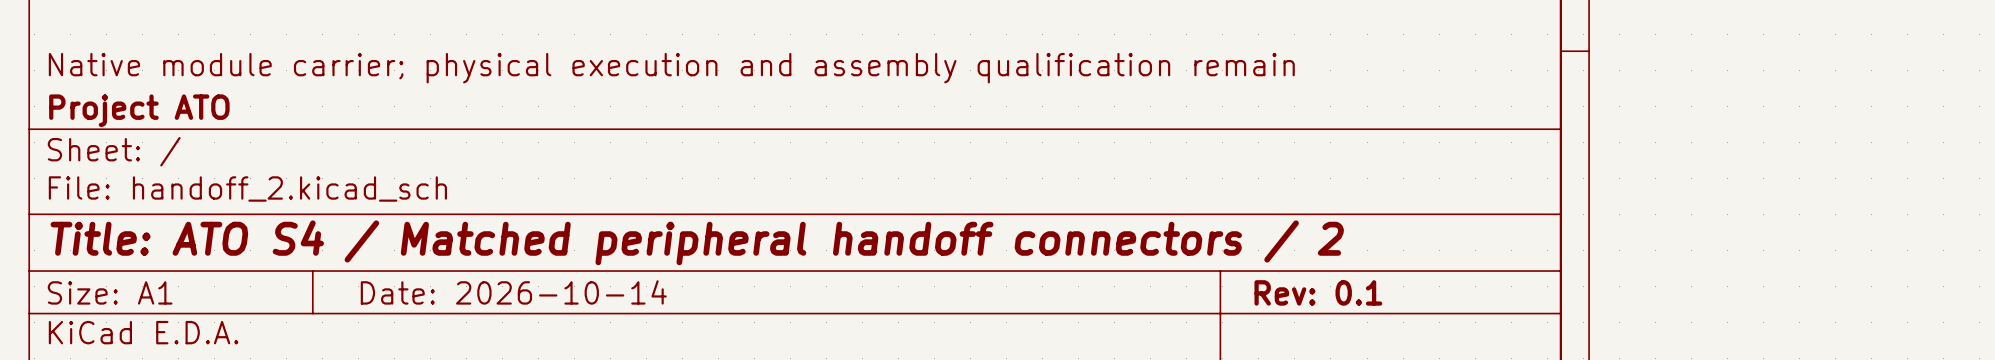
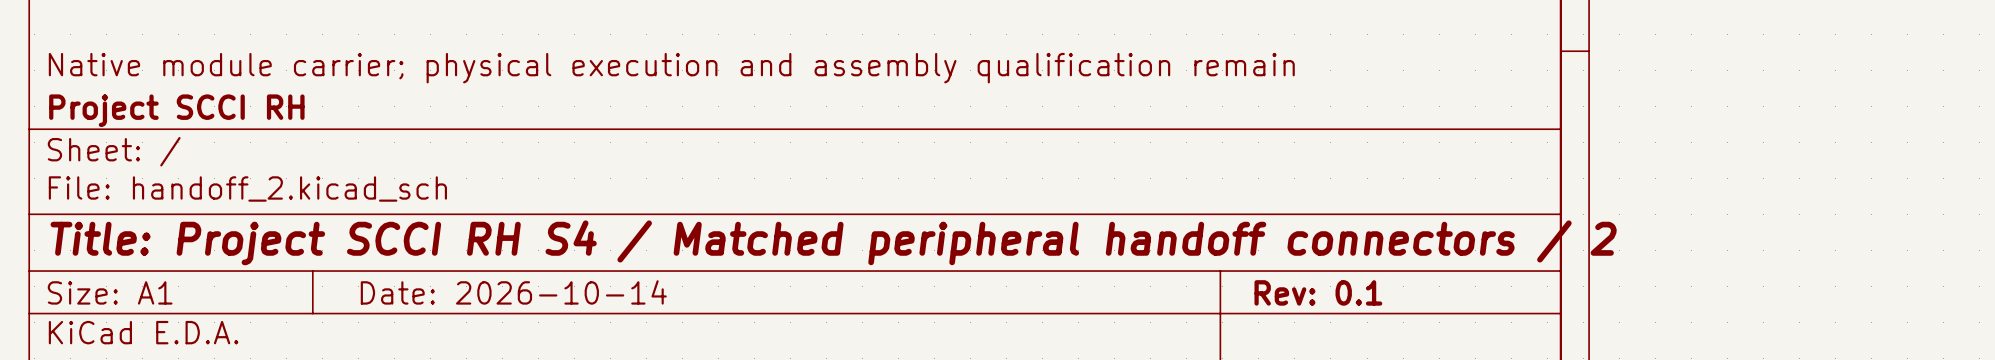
title block: Project ATO (139, 110) -> Project SCCI RH (176, 110)
title block: Title: ATO S4 / Matched peripheral handoff connectors / 2 (697, 242) -> Title: Project SCCI RH S4 / Matched peripheral handoff connectors / 2 (833, 242)

